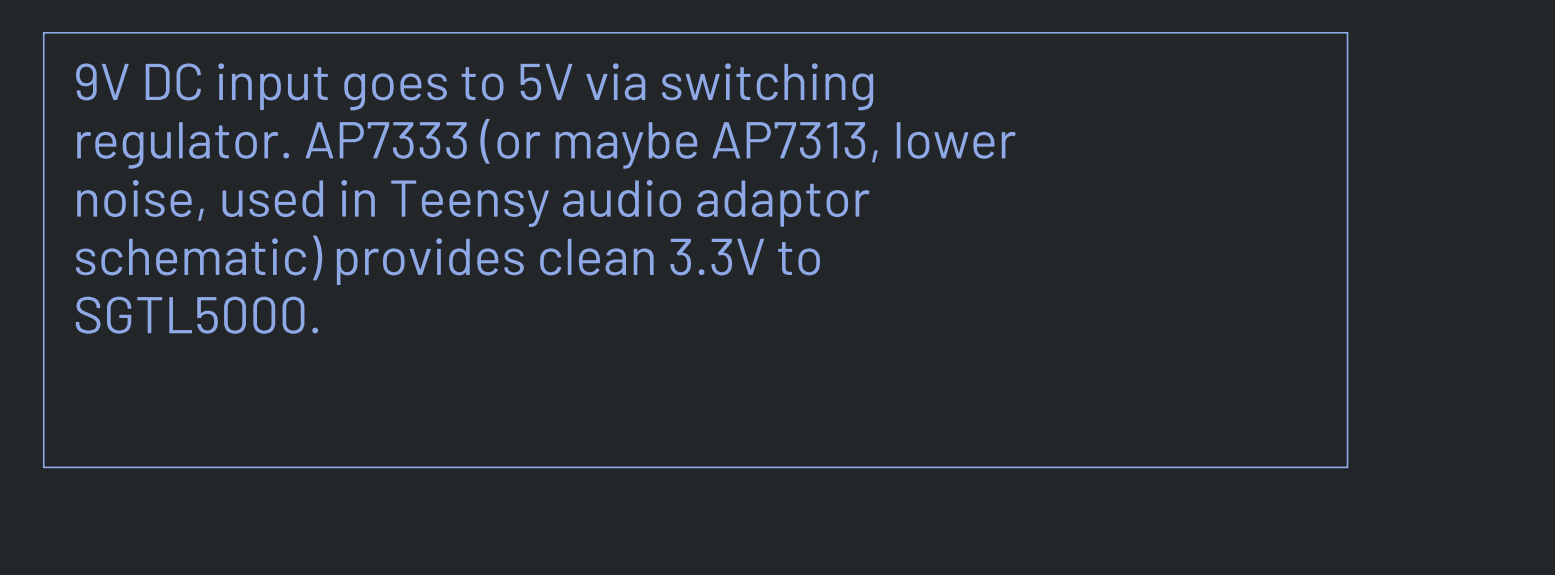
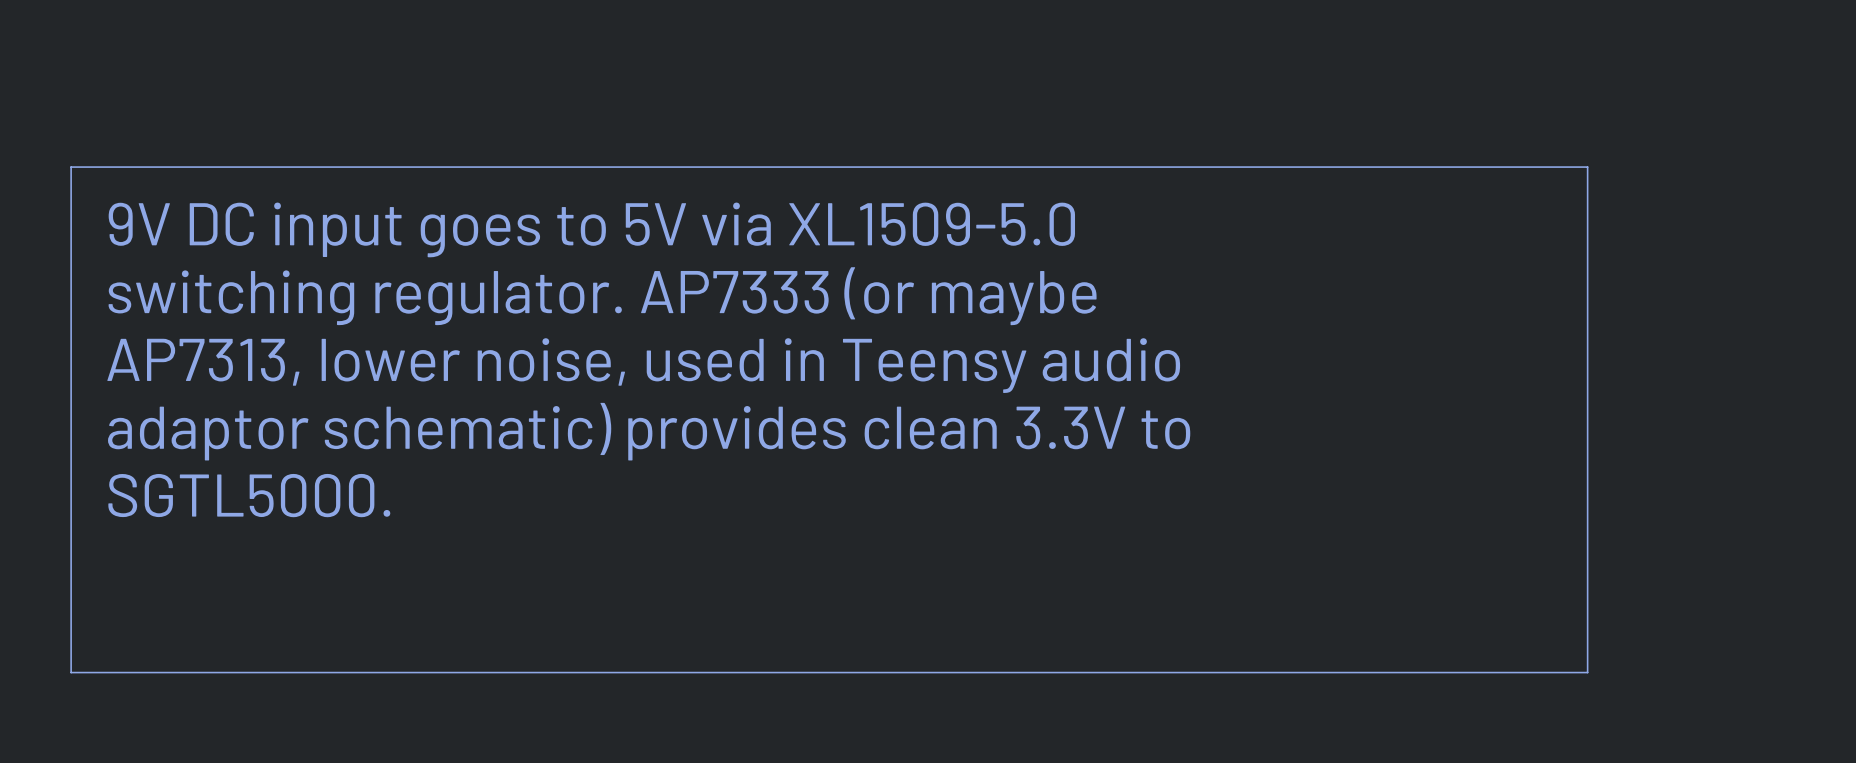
text: 9V DC input goes to 5V via switching (474, 86) -> 9V DC input goes to 5V via XL1509-5.0 (591, 229)
text: regulator. AP7333 (or maybe AP7313, lower (546, 143) -> switching regulator. AP7333 (or maybe (602, 296)
text: noise, used in Teensy audio adaptor (473, 203) -> AP7313, lower noise, used in Teensy audio (643, 365)
text: schematic) provides clean 3.3V to (447, 260) -> adaptor schematic) provides clean 3.3V to (649, 431)

